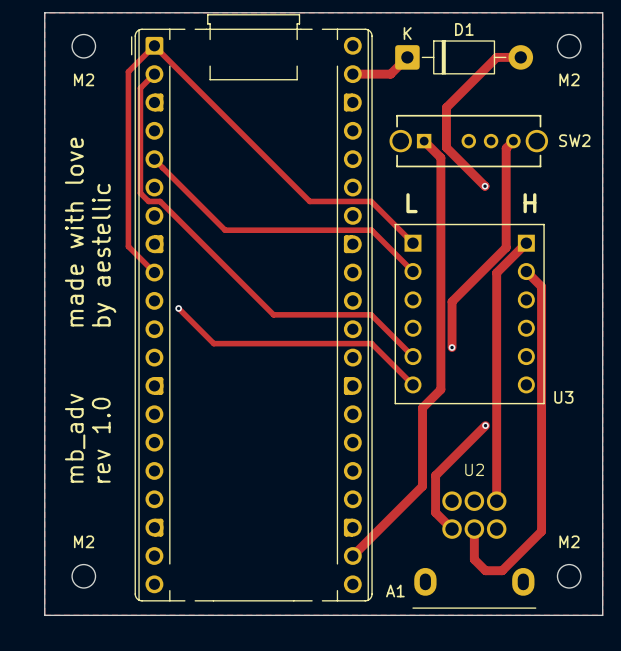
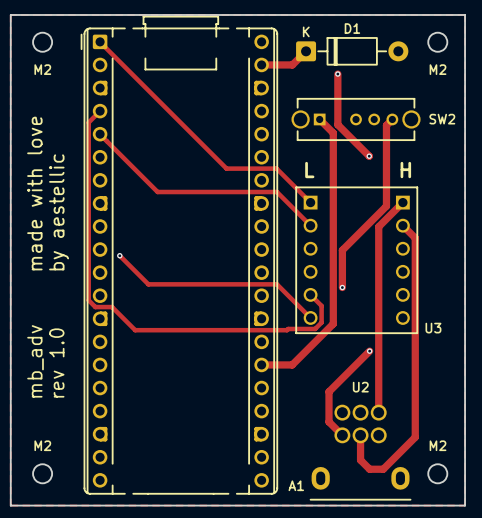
track: (154, 45) (128, 71) (128, 246) (154, 272) -> none
track: (520, 57) (496, 57) (446, 107) -> (337, 74) (337, 92)
track: (154, 74) (140, 88) (140, 144) -> (100, 111) (88, 122)
via: none -> (337, 74)
track: (140, 193) (148, 201) (160, 201) (273, 314) (371, 314) (412, 356) -> (88, 161) (88, 300) (95, 307) (112, 307) (135, 330) (315, 328) (321, 322) (321, 305) (310, 294)
track: (440, 389) (422, 407) (422, 486) (352, 555) -> (333, 321) (292, 364) (261, 364)

